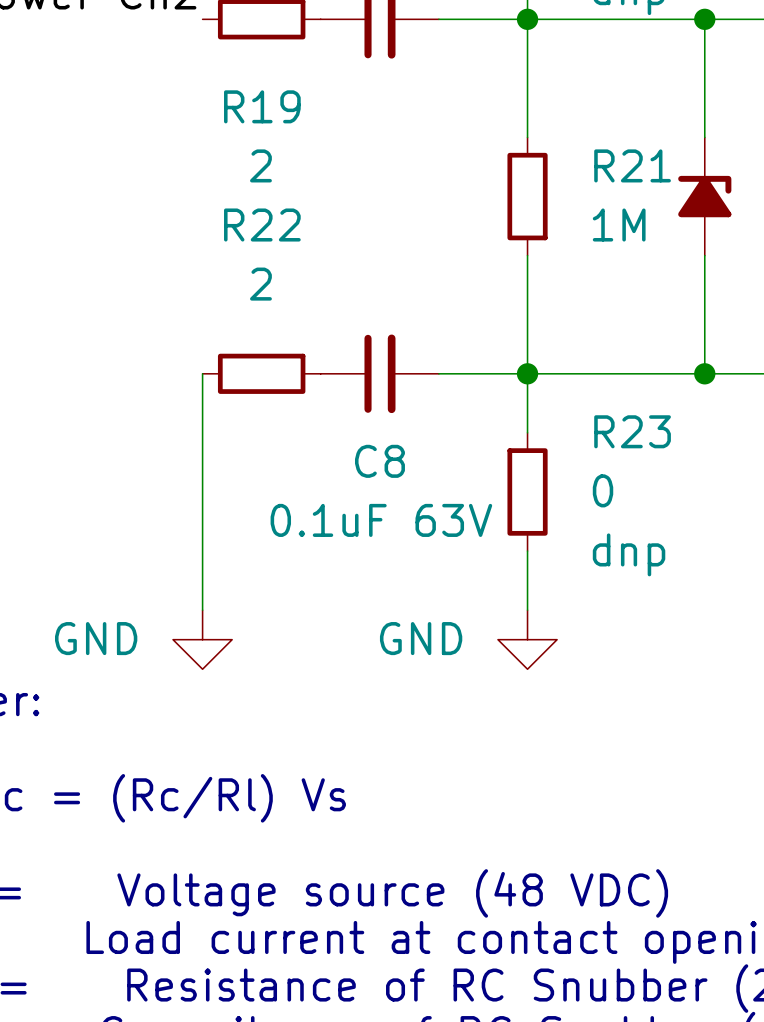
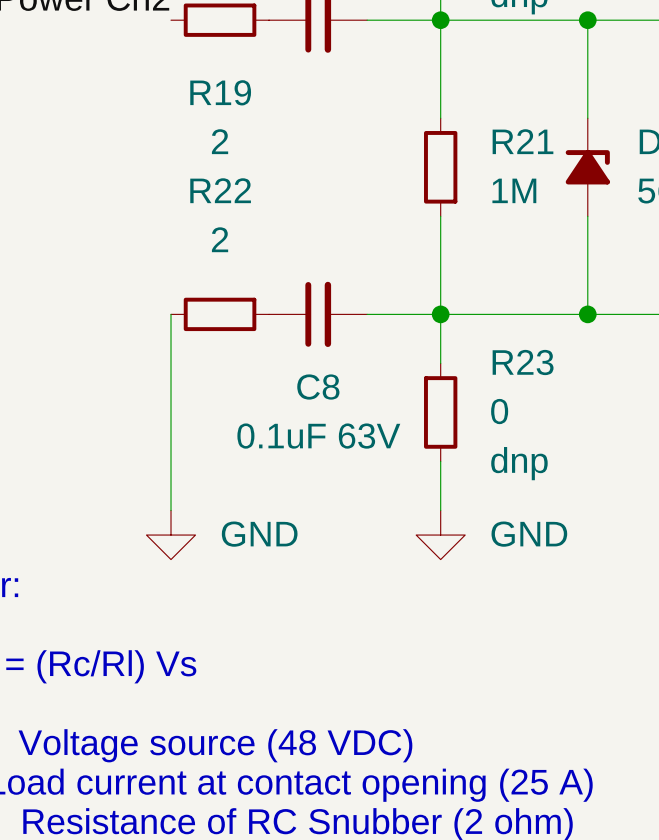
power symbol text position: GND (96, 638) -> GND (259, 534)
power symbol text position: GND (421, 638) -> GND (529, 534)

